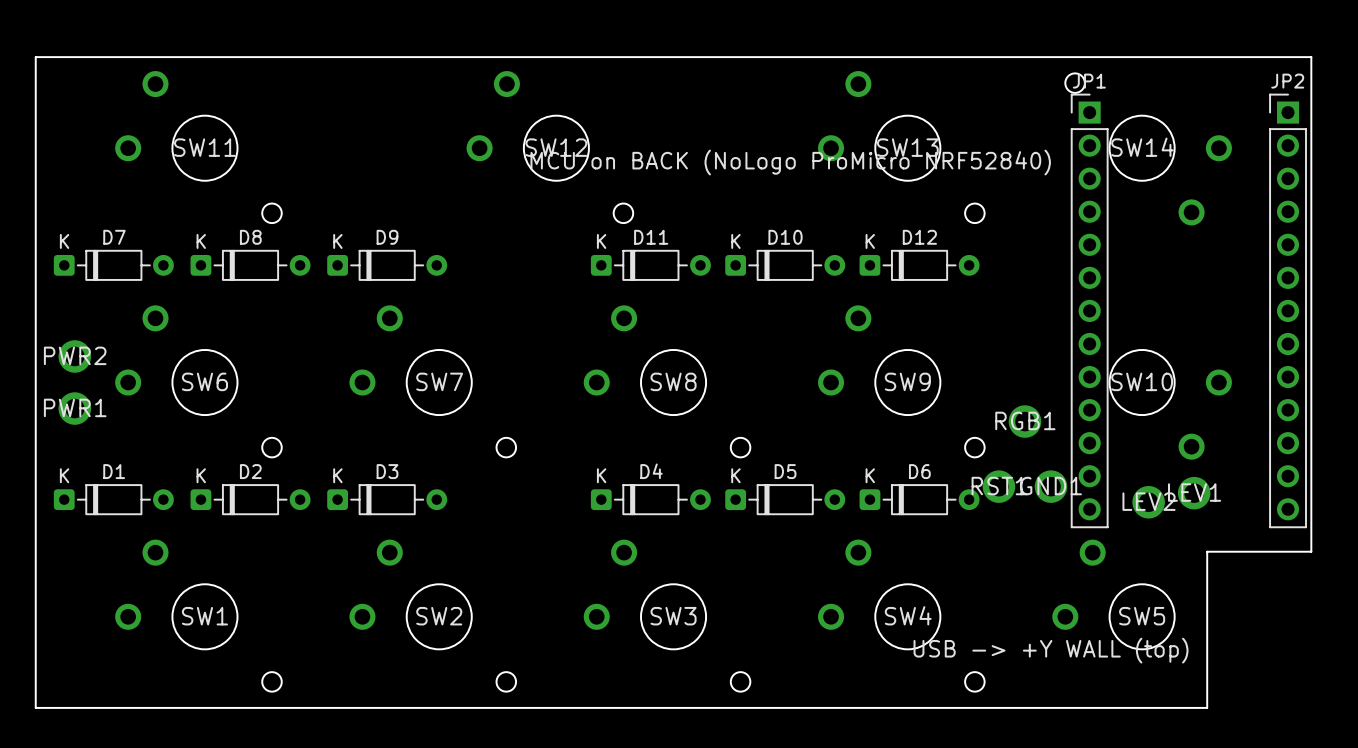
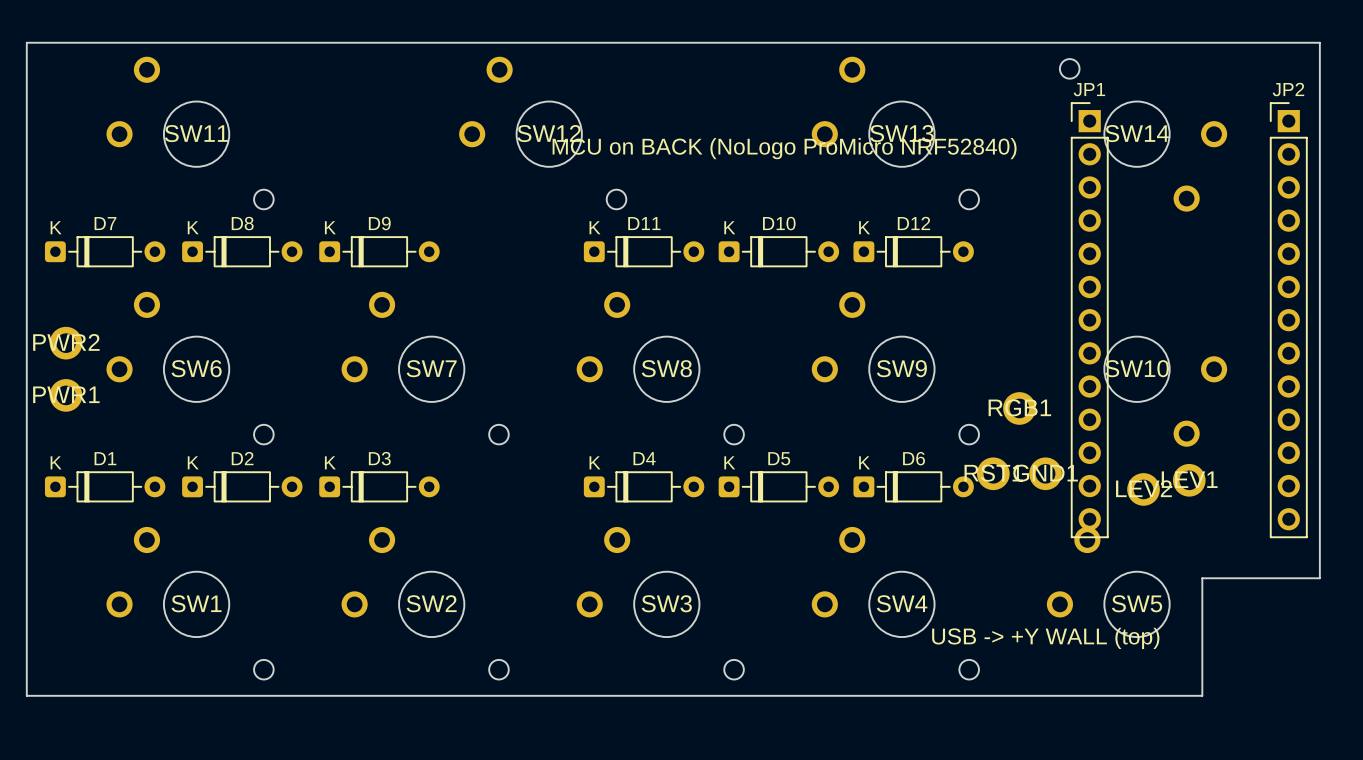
board edge: (1311, 57) (1311, 551) (1207, 551) (1207, 590) -> (1306, 42) (1319, 42) (1319, 578) (1202, 578)
JP1 position: (1089, 310) -> (1089, 320)
JP2 position: (1288, 310) -> (1288, 320)

